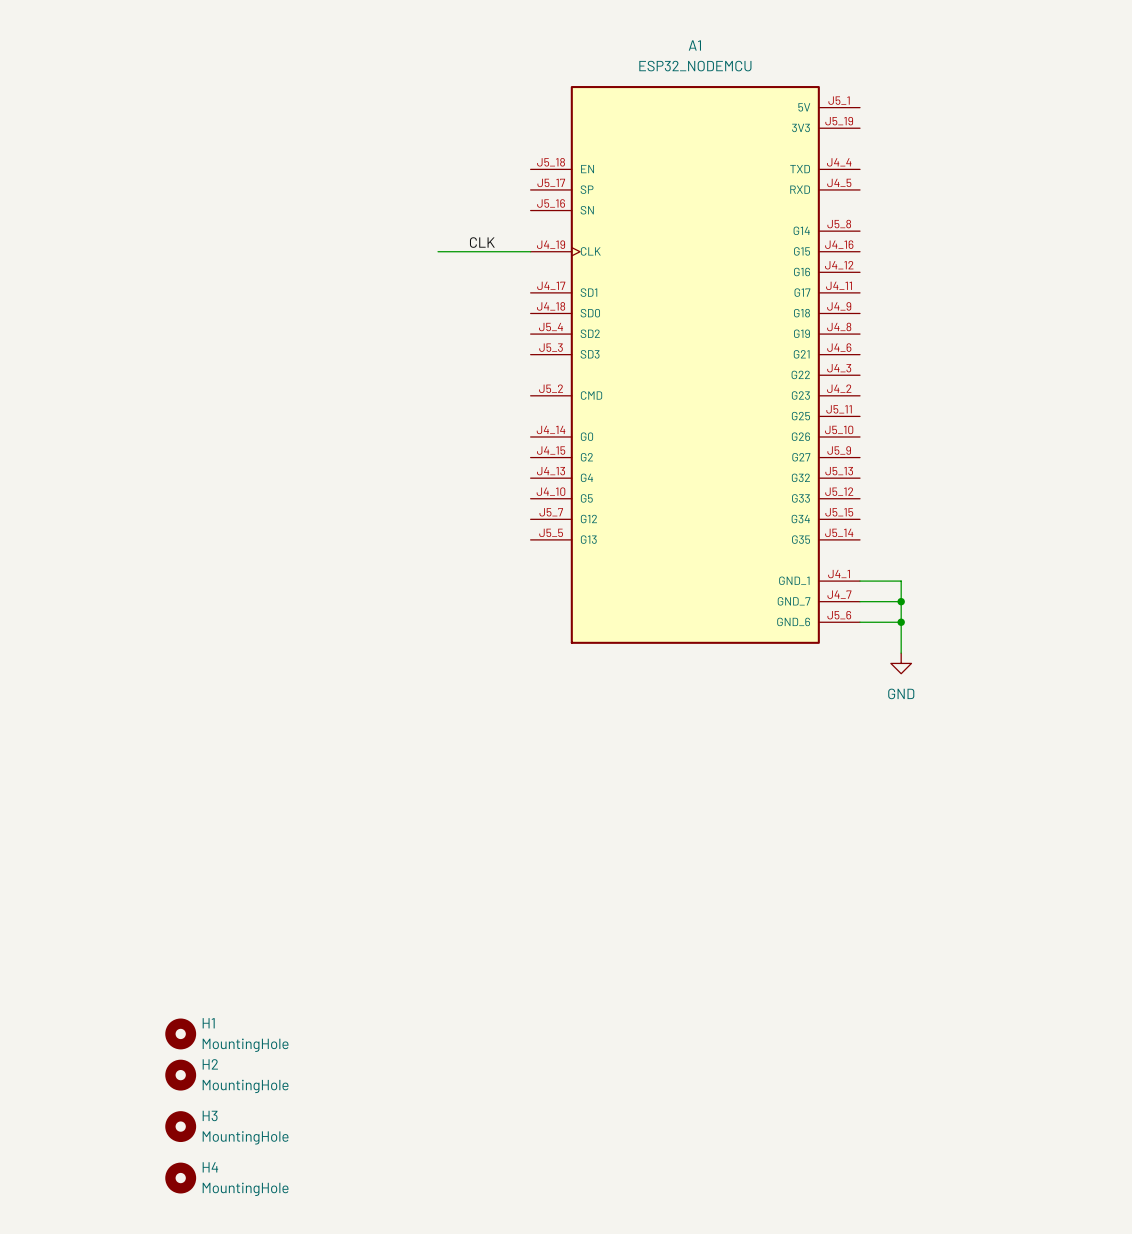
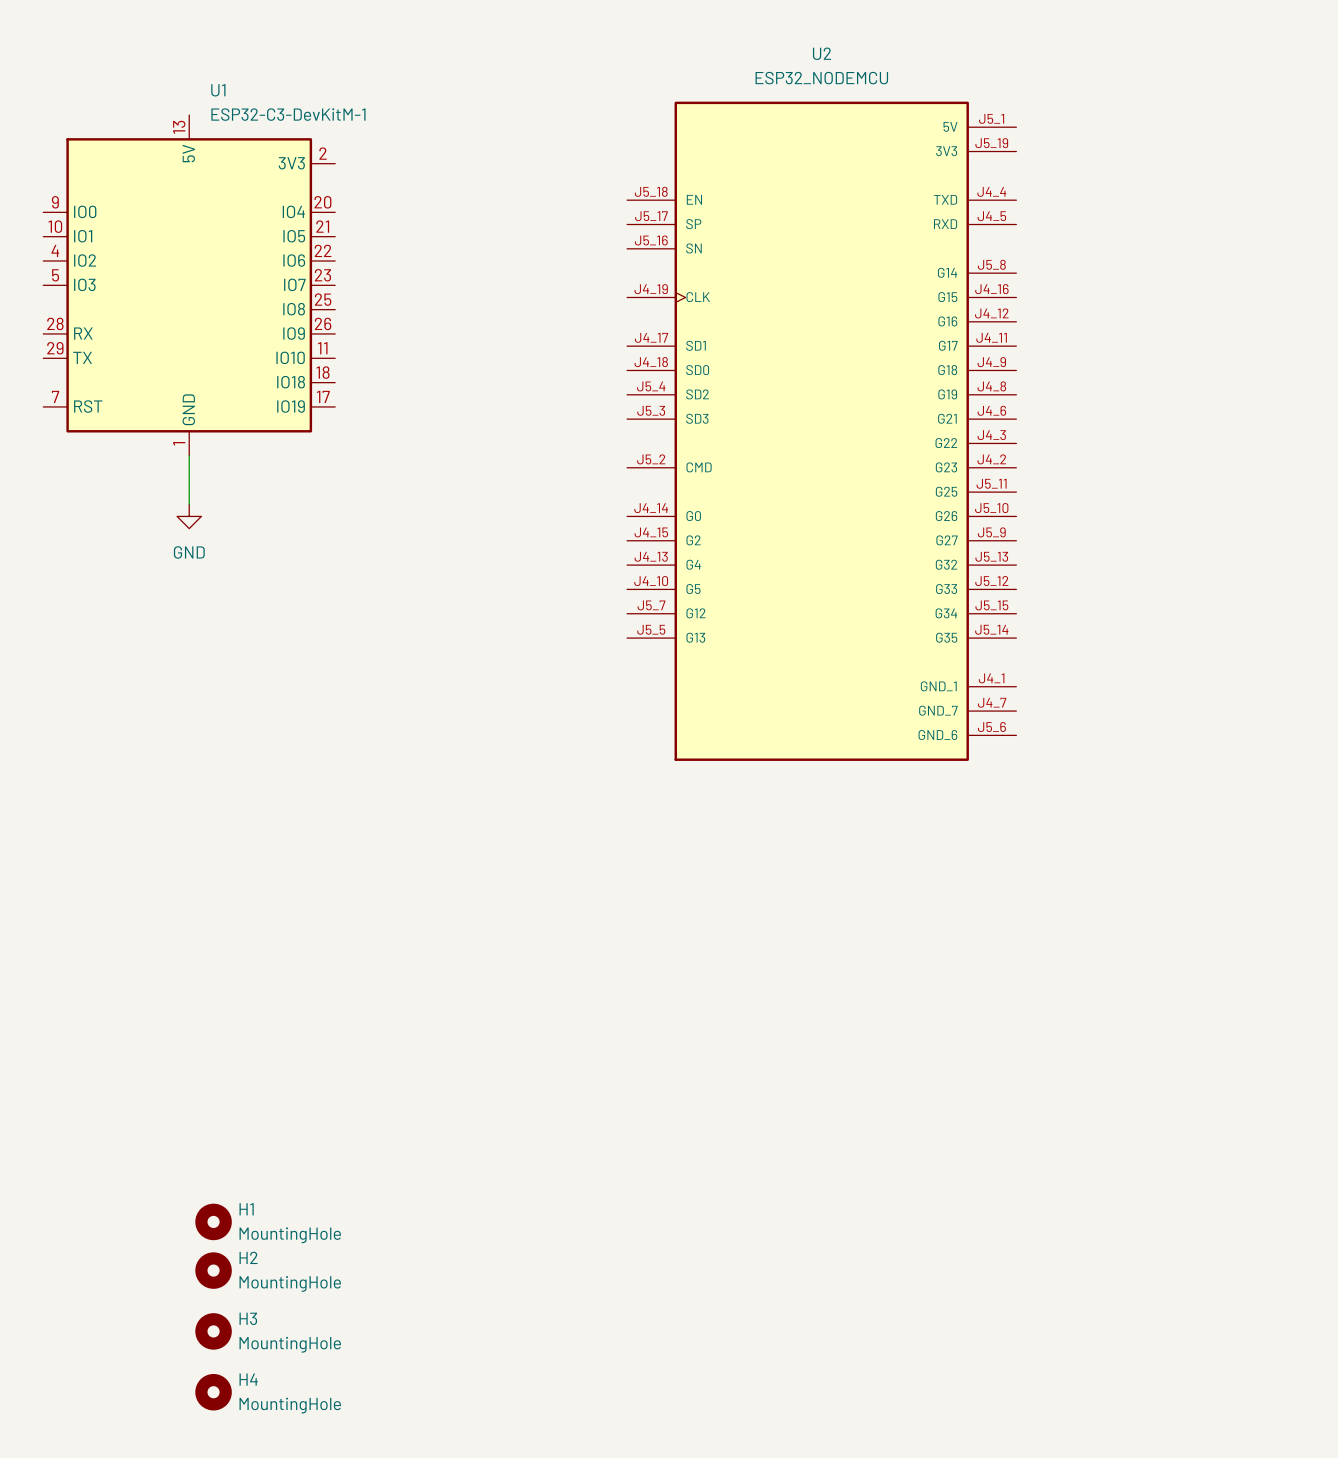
A1 name: A1 (694, 45) -> U2 (821, 53)
U1: none -> ESP32-C3-DevKitM-1 (189, 285)
label: CLK (482, 242) -> none
wire: (438, 251) (530, 251) -> none
wire: none -> (189, 455) (189, 504)
power symbol: none -> GND (189, 516)
wire: (860, 581) (901, 581) (901, 653) -> none
wire: (860, 601) (901, 601) -> none
junction: (901, 601) -> none
wire: (860, 622) (901, 622) -> none
junction: (901, 622) -> none
power symbol: GND (901, 663) -> none

